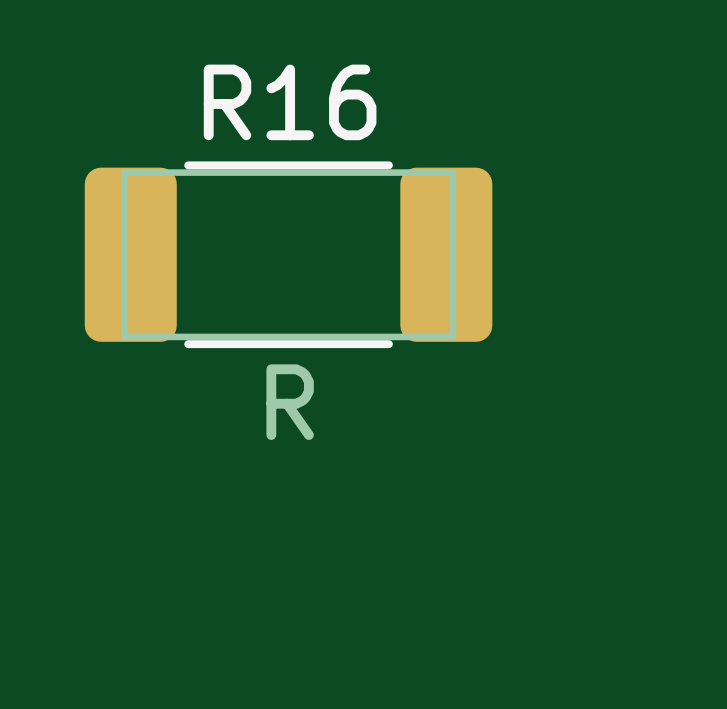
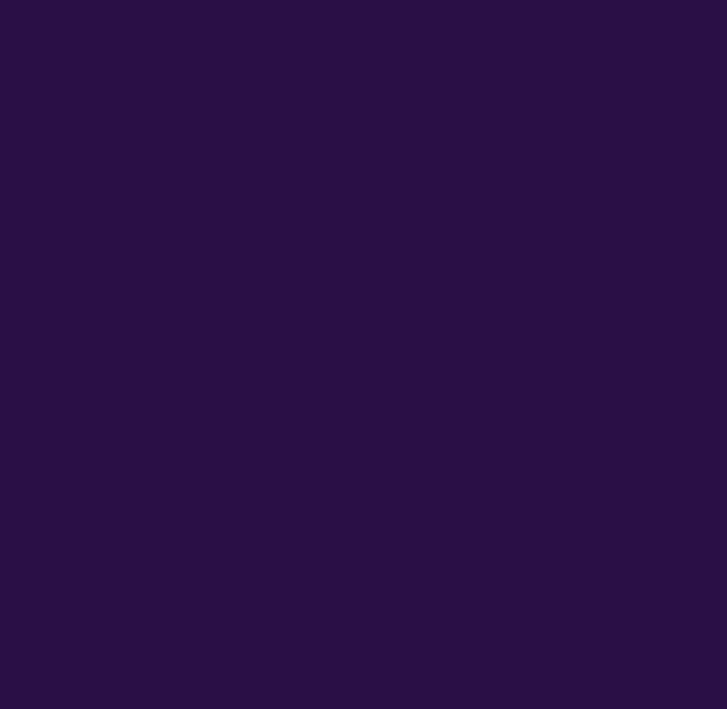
R16: R (288, 254) -> none

